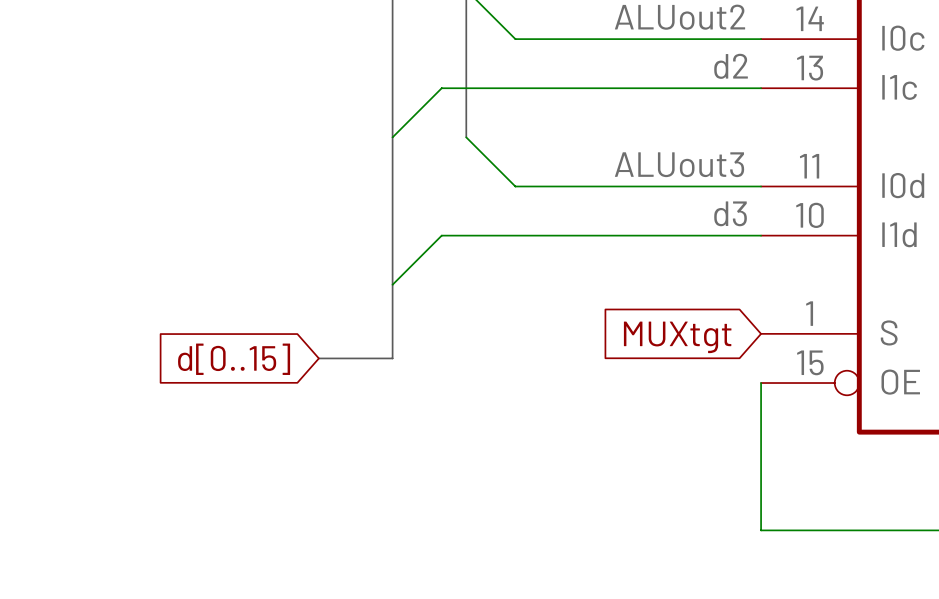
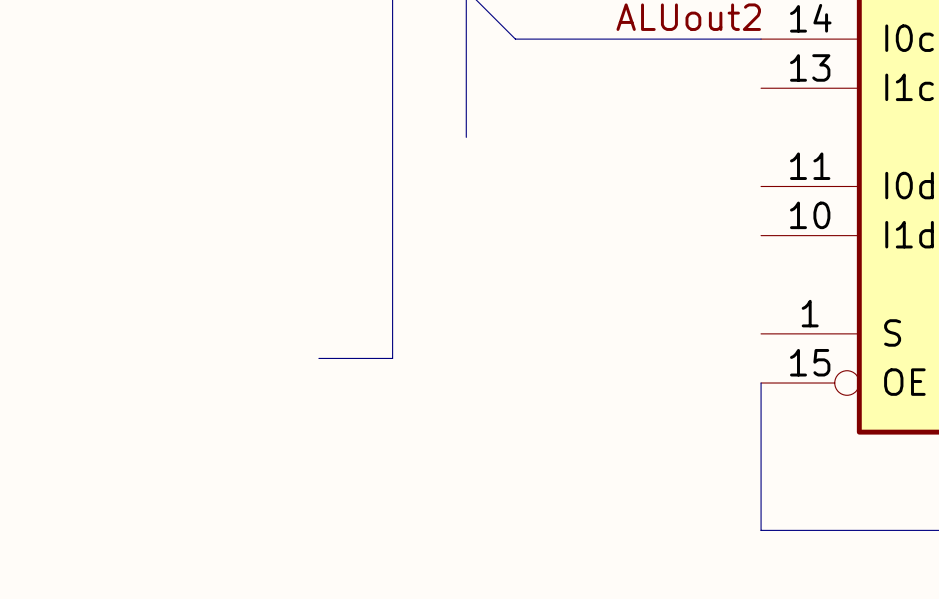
label: d2 (731, 66) -> none
wire: (761, 88) (441, 88) (392, 137) -> none
wire: (466, 137) (515, 186) (761, 186) -> none
label: ALUout3 (679, 164) -> none
label: d3 (730, 213) -> none
wire: (761, 235) (441, 235) (392, 284) -> none
global label: MUXtgt (677, 337) -> none
global label: d[0..15] (234, 359) -> none

